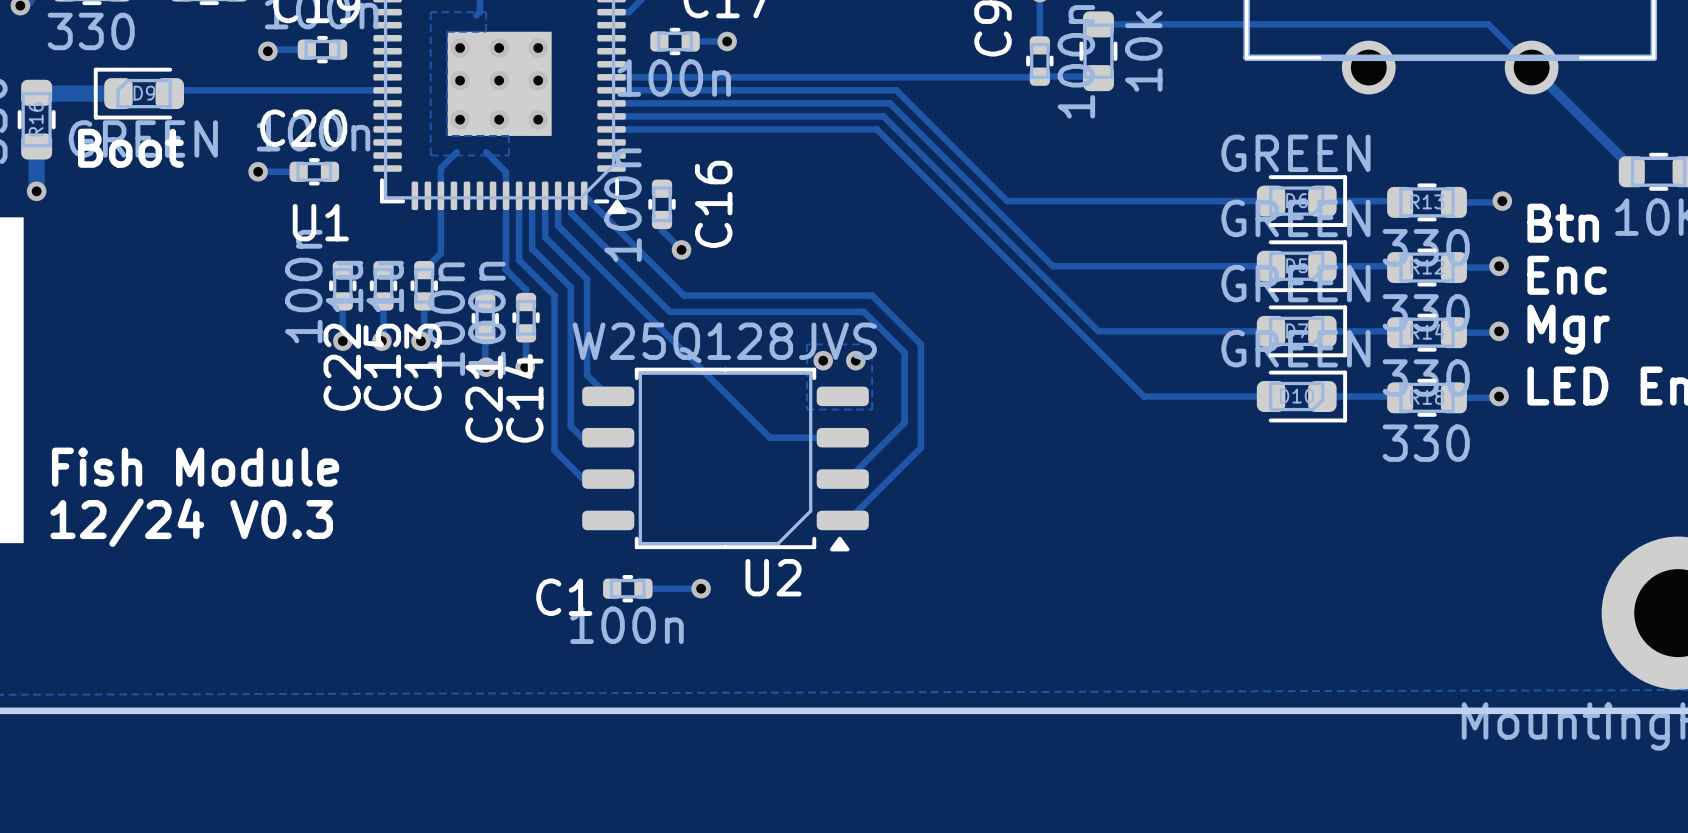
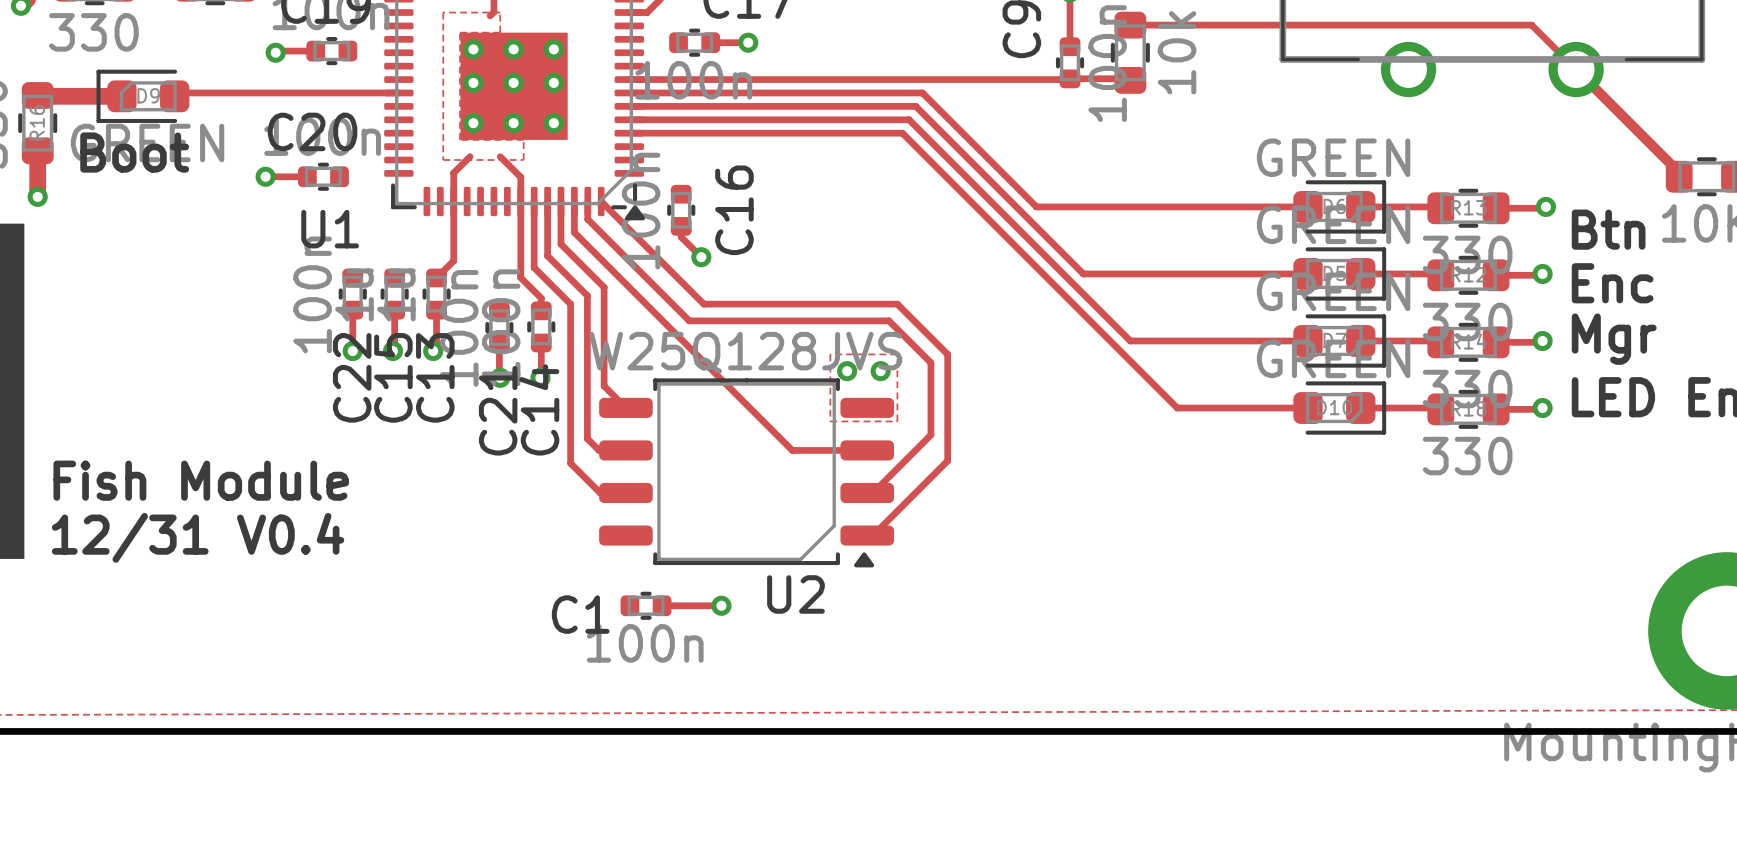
text: 12/24 V0.3 (191, 522) -> 12/31 V0.4 (198, 537)

